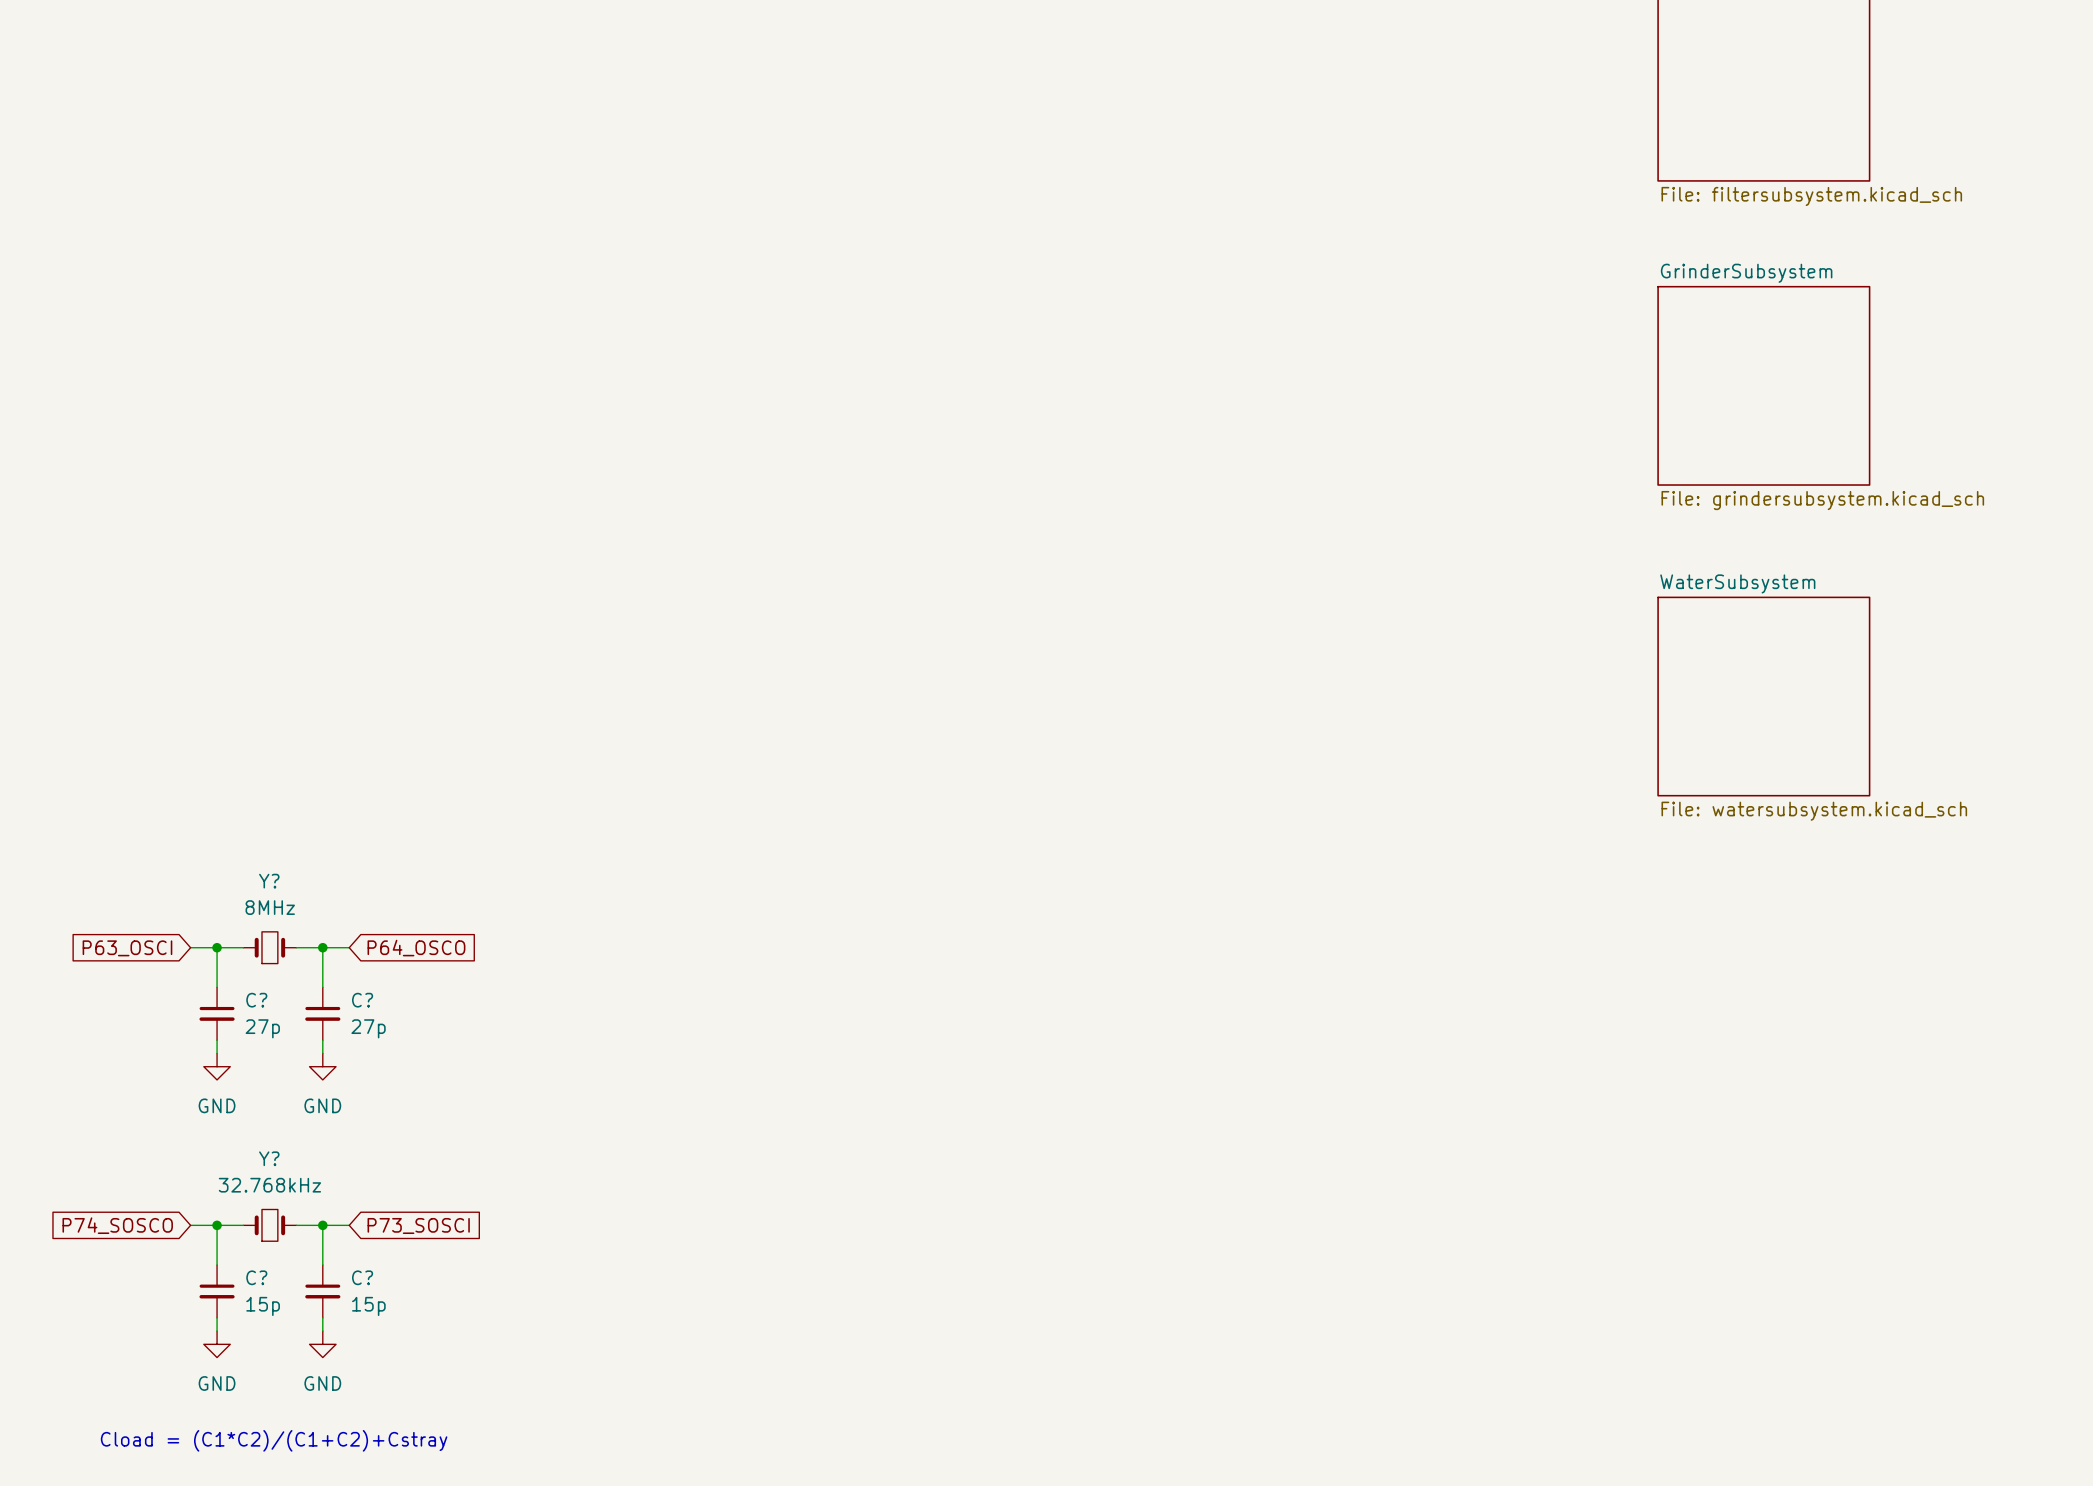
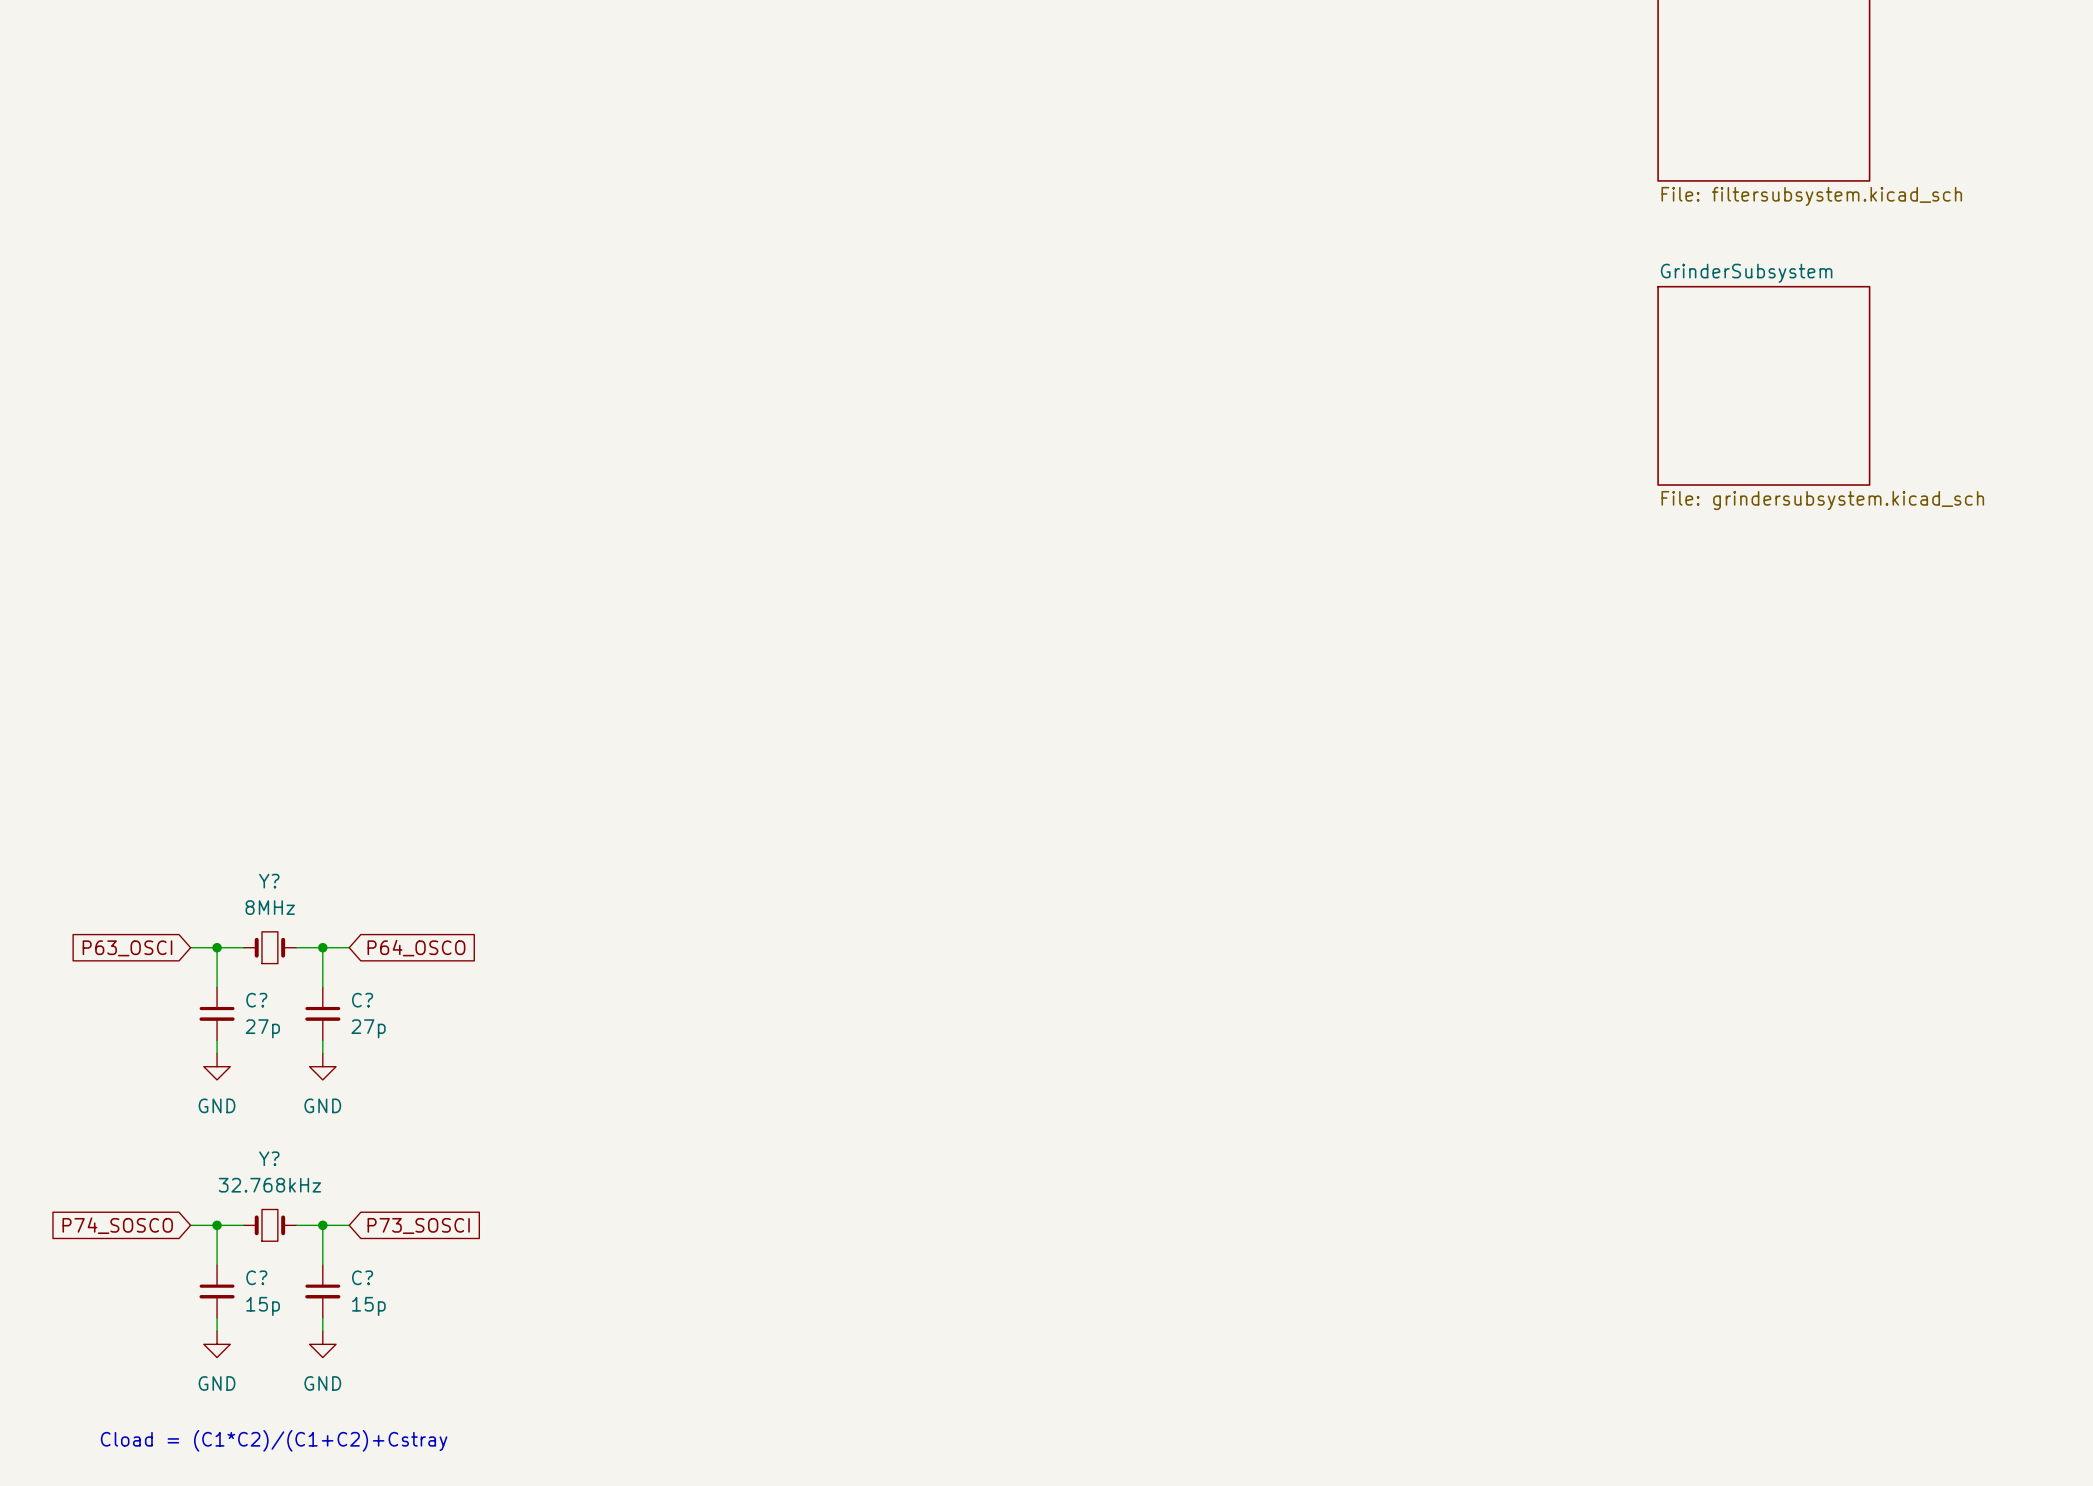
sheet WaterSubsystem: File: watersubsystem.kicad_sch (1763, 696) -> none

